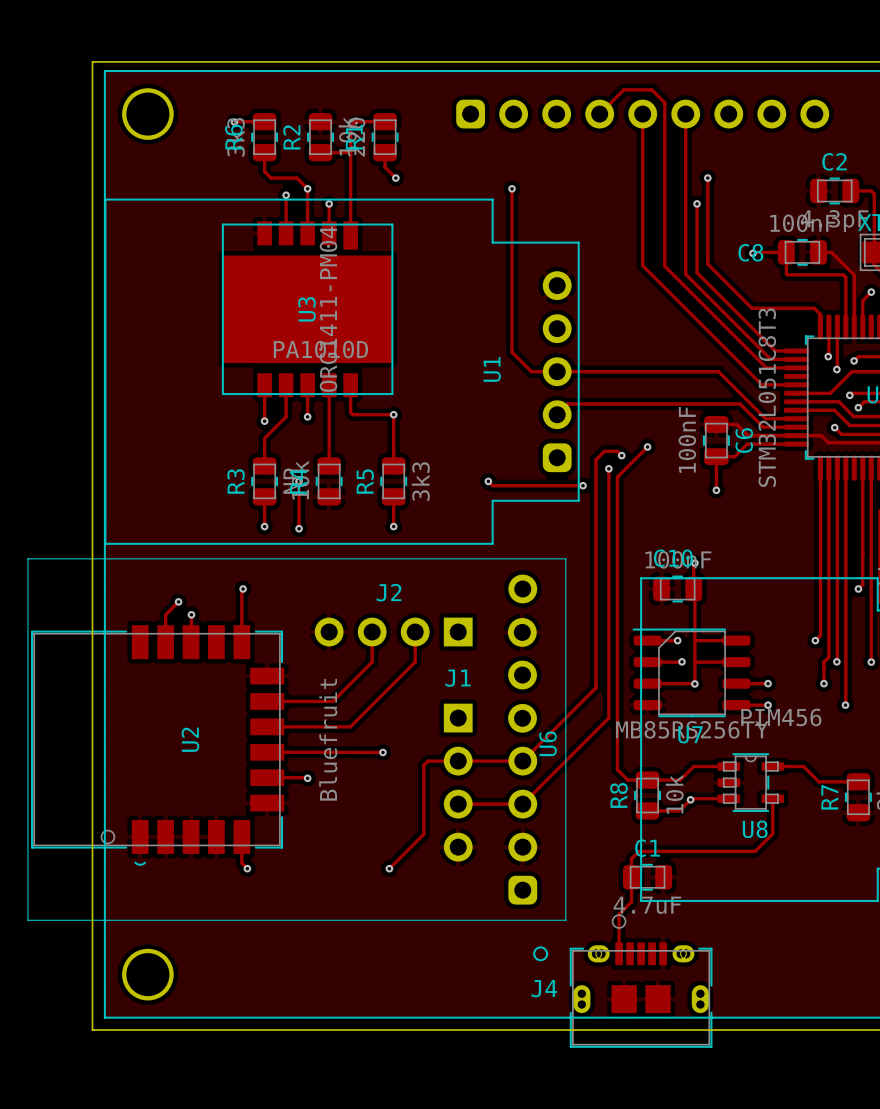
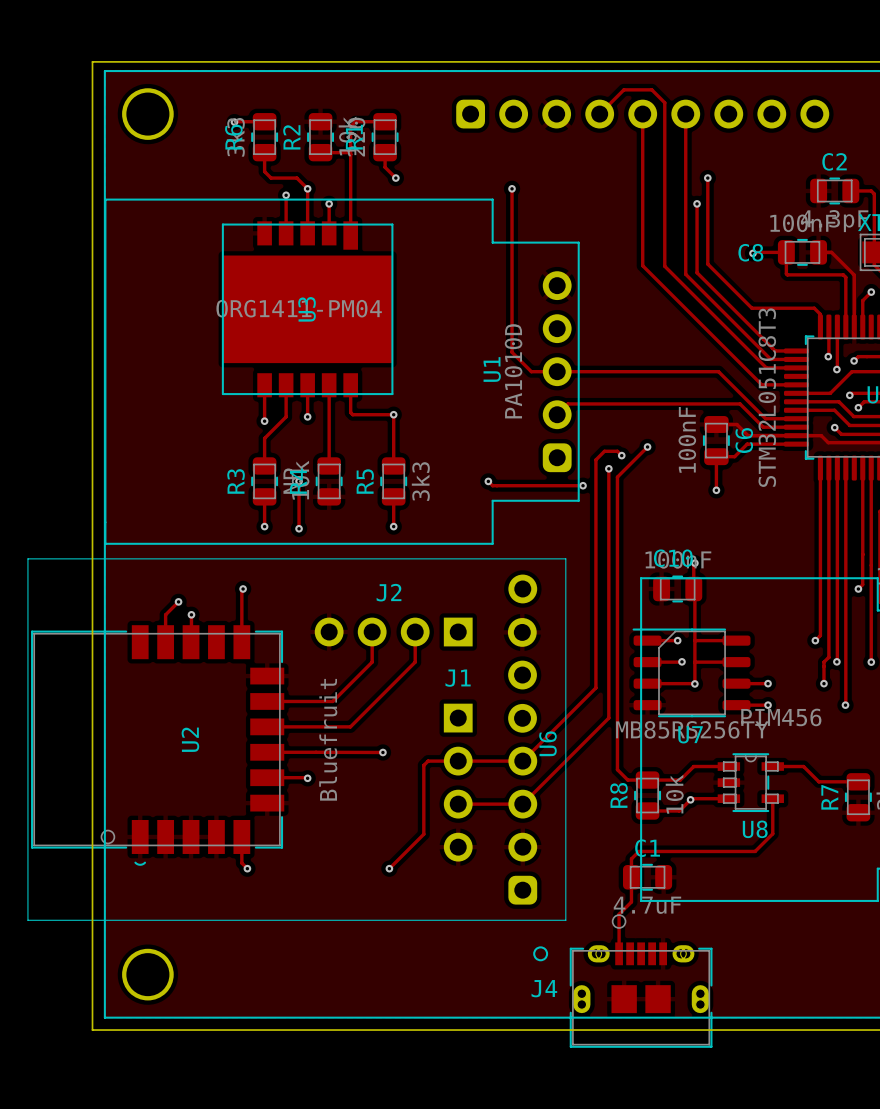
U3 value rotation: 0° (328, 309) -> 90° clockwise (299, 308)
U1 value rotation: 0° (320, 349) -> 90° counterclockwise (513, 371)
U1 value position: PA1010D (320, 349) -> PA1010D (513, 371)

